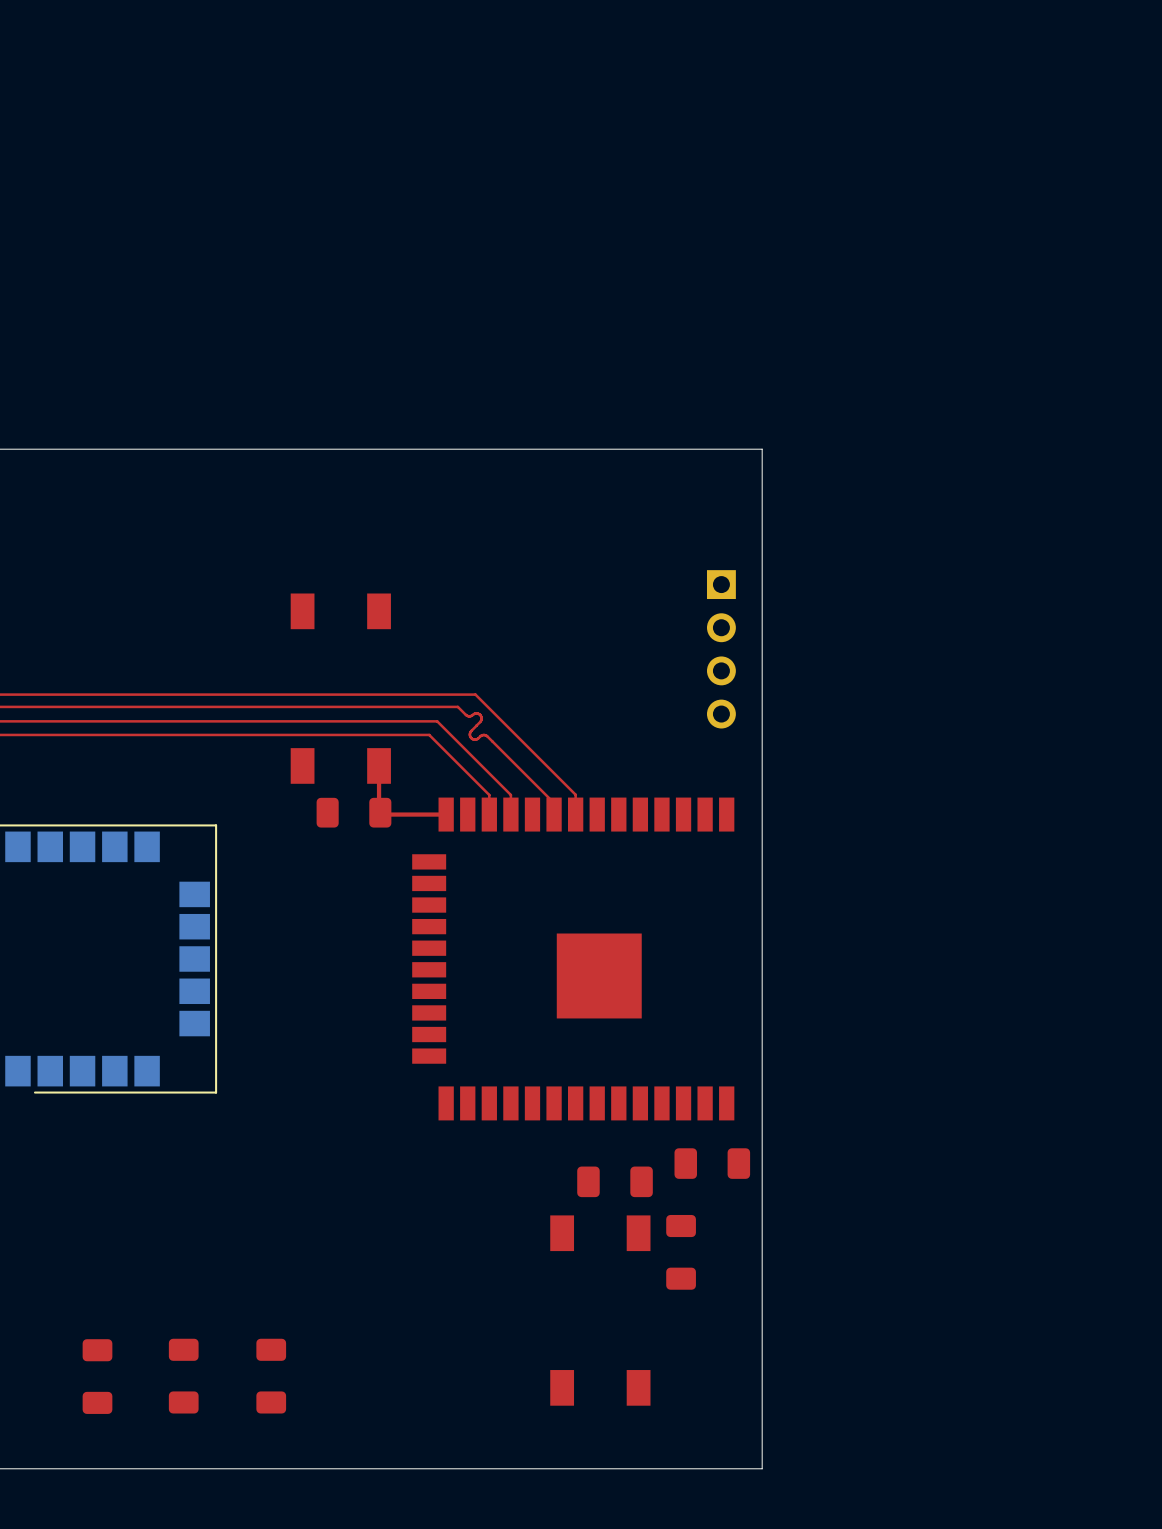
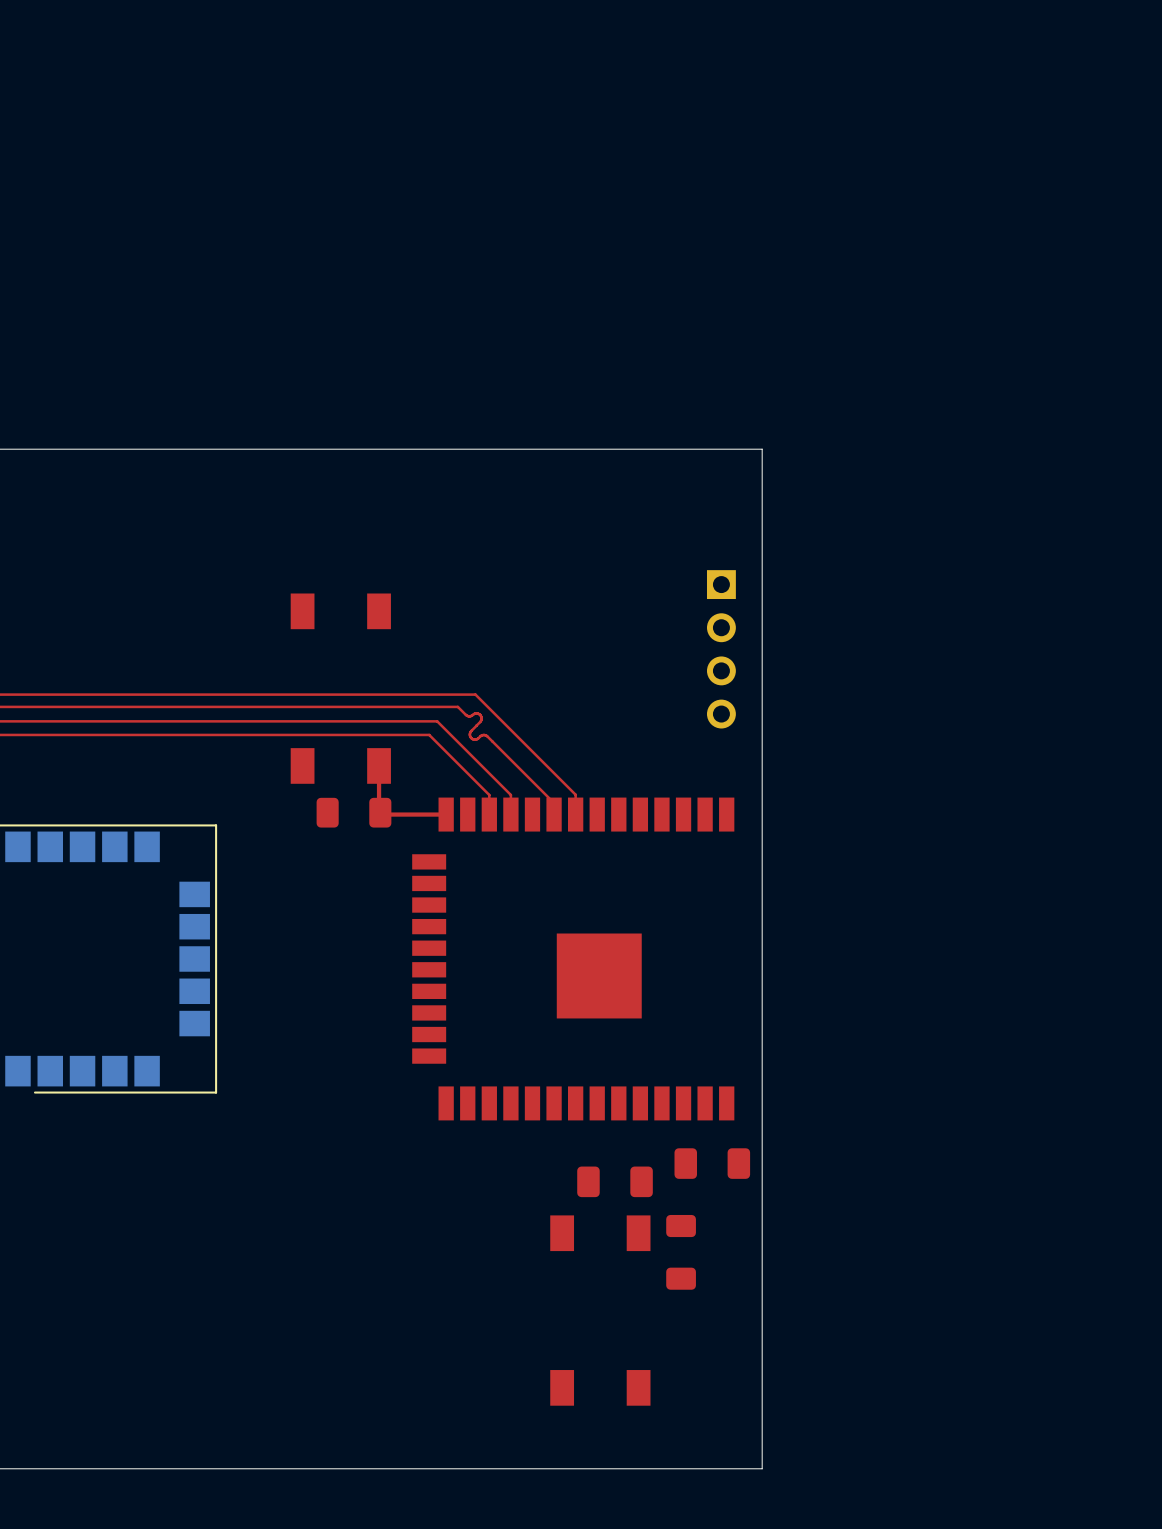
part: (97, 1376) -> none
part: (183, 1376) -> none
part: (271, 1376) -> none

